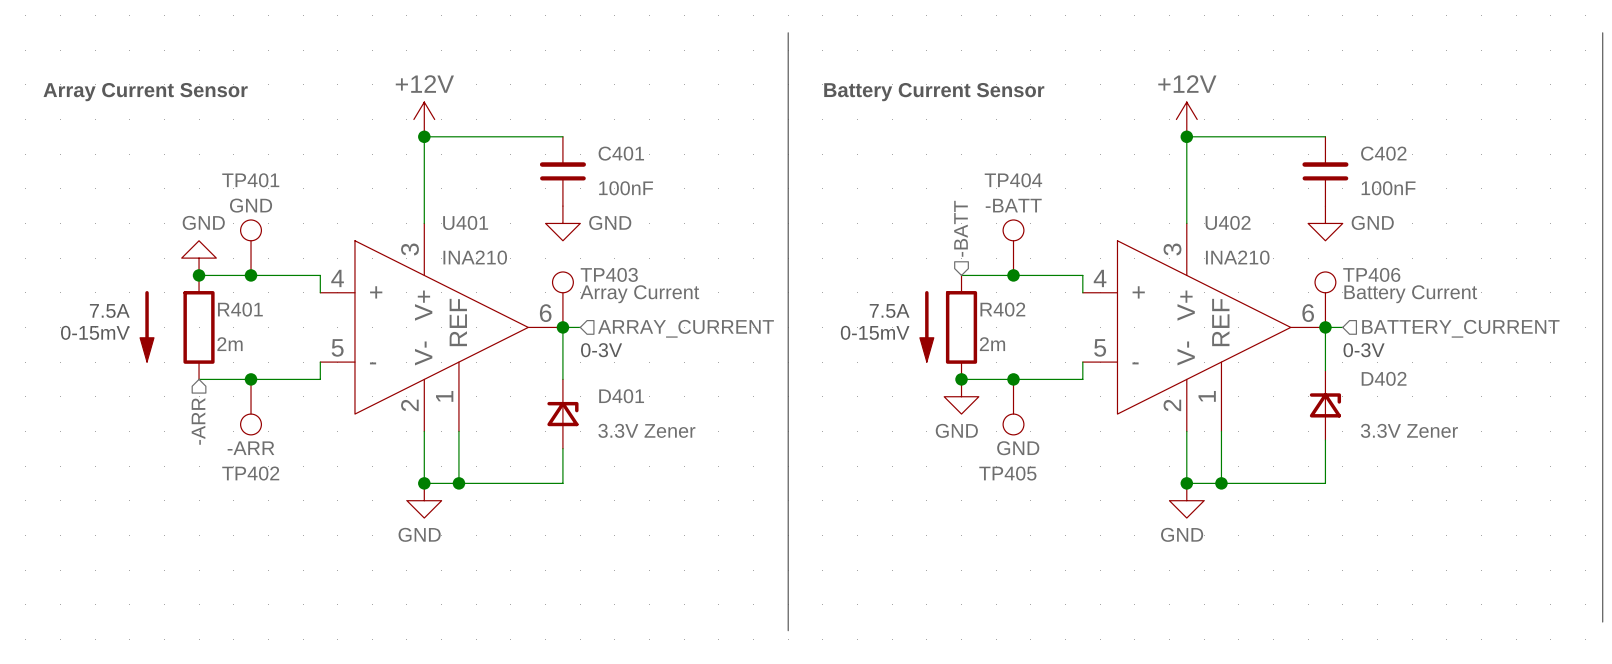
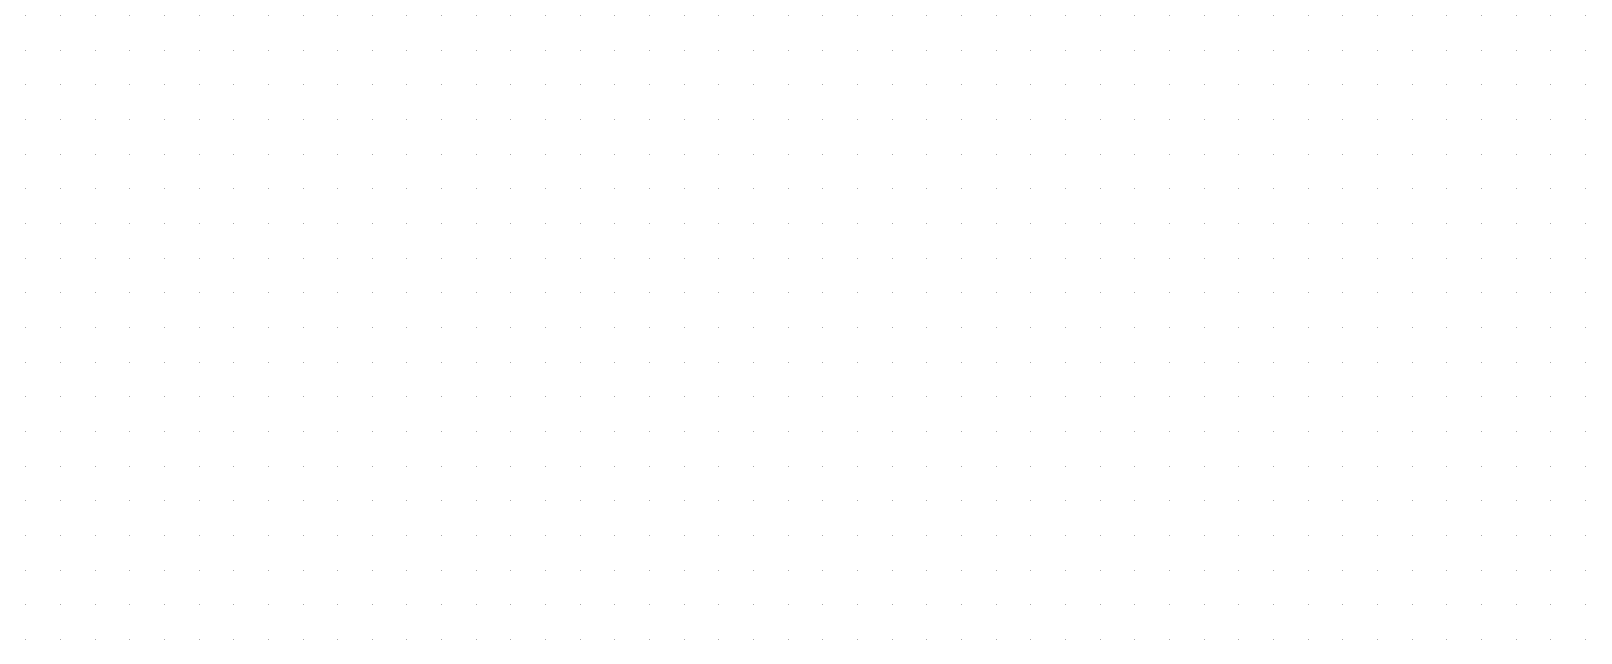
line: (788, 32) (788, 630) -> none
line: (1602, 32) (1602, 622) -> none
text: Array Current Sensor (145, 92) -> none
text: Battery Current Sensor (934, 92) -> none
power symbol: +12V (424, 119) -> none
power symbol: +12V (1186, 119) -> none
junction: (424, 136) -> none
wire: (562, 136) (424, 136) (424, 223) -> none
junction: (1186, 136) -> none
wire: (1325, 136) (1186, 136) (1186, 223) -> none
C401: 100nF (562, 171) -> none
C402: 100nF (1325, 171) -> none
power symbol: GND (562, 223) -> none
power symbol: GND (1325, 223) -> none
hierarchical label: -BATT (961, 228) -> none
TP401: GND (251, 247) -> none
TP404: -BATT (1013, 247) -> none
power symbol: GND (199, 258) -> none
wire: (199, 275) (320, 275) (320, 292) -> none
junction: (199, 275) -> none
junction: (251, 275) -> none
wire: (961, 275) (1082, 275) (1082, 292) -> none
junction: (1013, 275) -> none
TP403: Array Current (562, 299) -> none
TP406: Battery Current (1325, 299) -> none
text: 7.5A (109, 310) -> none
text: 7.5A (889, 310) -> none
power symbol: (147, 326) -> none
power symbol: (926, 326) -> none
R401: 2m (199, 327) -> none
U401: INA210 (441, 327) -> none
junction: (562, 327) -> none
wire: (580, 327) (562, 327) (562, 379) -> none
R402: 2m (961, 327) -> none
U402: INA210 (1204, 327) -> none
junction: (1325, 327) -> none
wire: (1342, 327) (1325, 327) (1325, 370) -> none
hierarchical label: ARRAY_CURRENT (685, 328) -> none
hierarchical label: BATTERY_CURRENT (1460, 328) -> none
text: 0-15mV (95, 332) -> none
text: 0-15mV (875, 332) -> none
text: 0-3V (601, 350) -> none
text: 0-3V (1364, 350) -> none
wire: (320, 362) (320, 379) (199, 379) -> none
wire: (1082, 362) (1082, 379) (961, 379) -> none
junction: (251, 379) -> none
junction: (961, 379) -> none
junction: (1013, 379) -> none
power symbol: GND (961, 396) -> none
D402: 3.3V Zener (1325, 405) -> none
TP402: -ARR (251, 407) -> none
TP405: GND (1013, 407) -> none
D401: 3.3V Zener (562, 414) -> none
hierarchical label: -ARR (198, 421) -> none
wire: (424, 431) (424, 483) (562, 483) (562, 448) -> none
wire: (458, 431) (458, 483) -> none
wire: (1186, 431) (1186, 483) (1325, 483) (1325, 440) -> none
wire: (1221, 431) (1221, 483) -> none
junction: (424, 483) -> none
junction: (458, 483) -> none
junction: (1186, 483) -> none
junction: (1221, 483) -> none
power symbol: GND (424, 500) -> none
power symbol: GND (1186, 500) -> none

